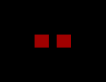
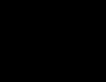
part: (52, 41) -> none

